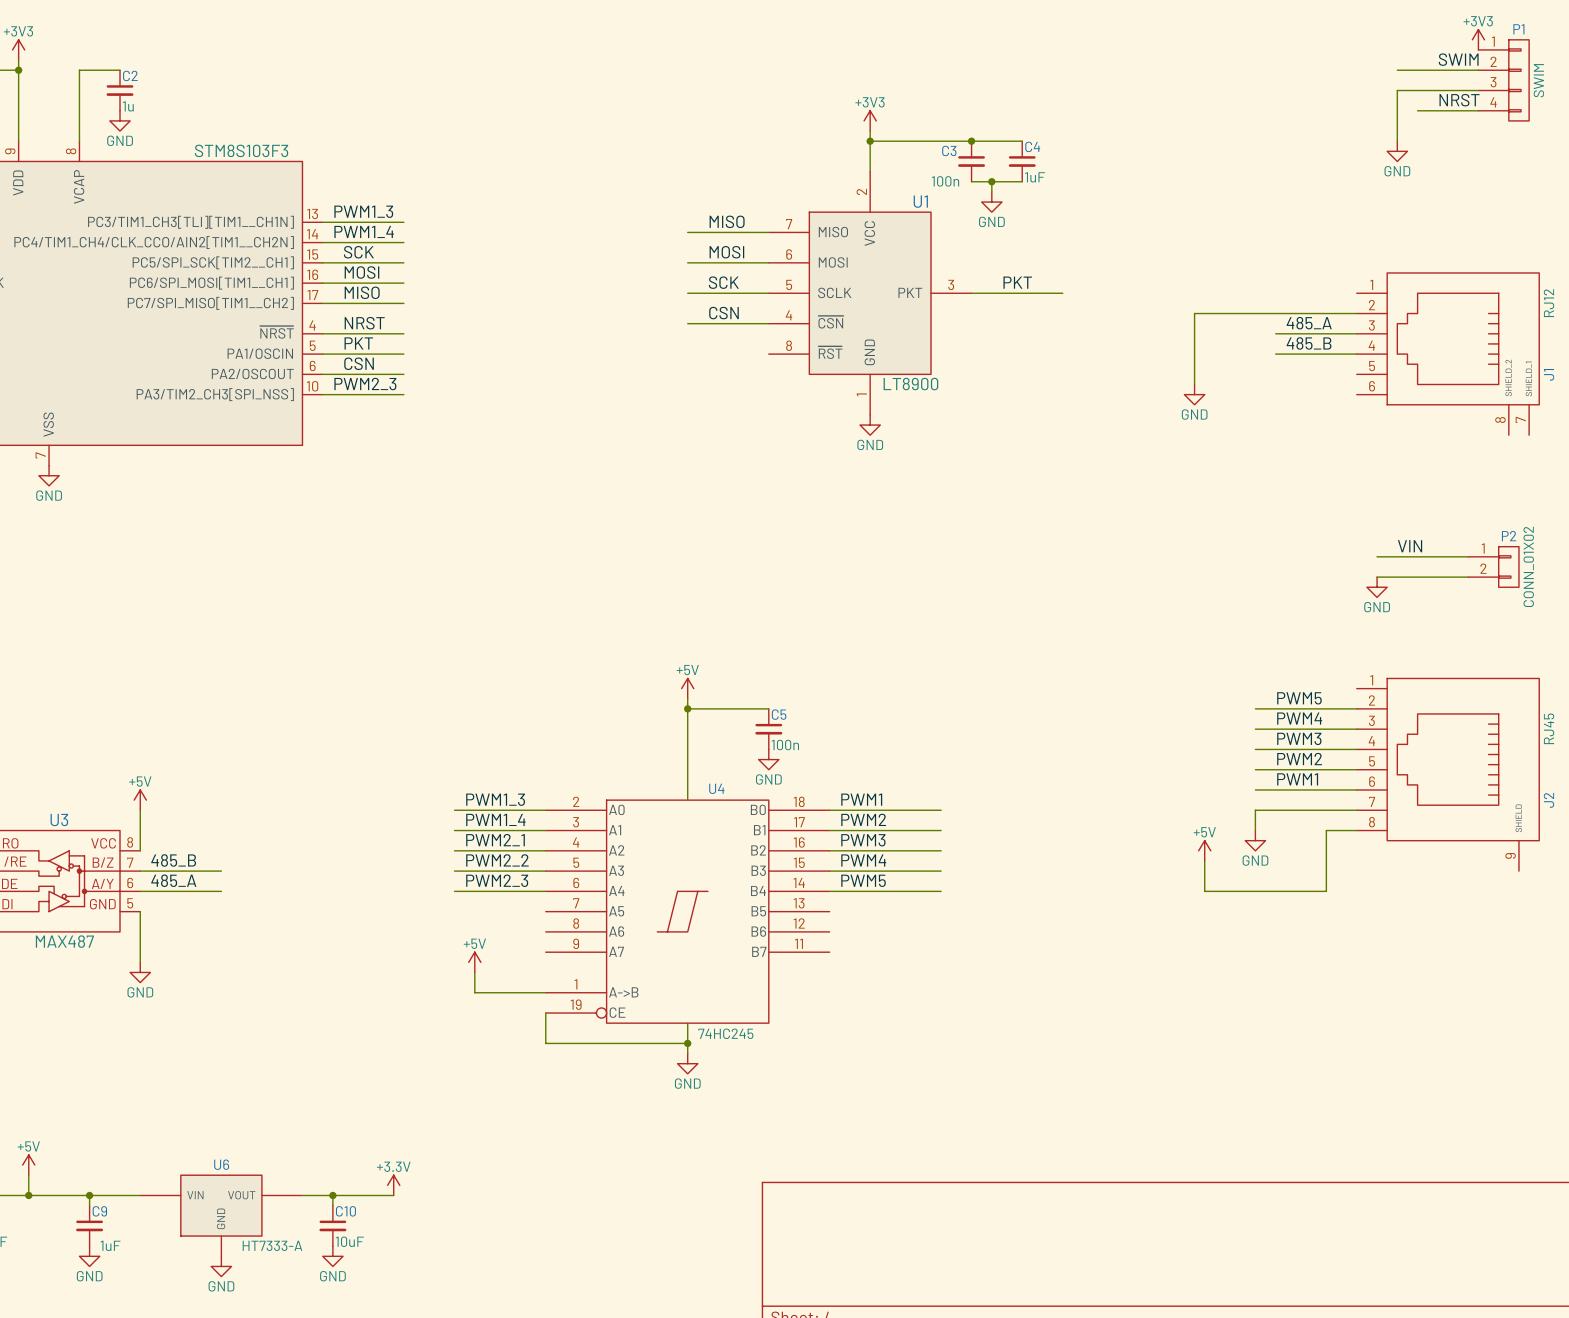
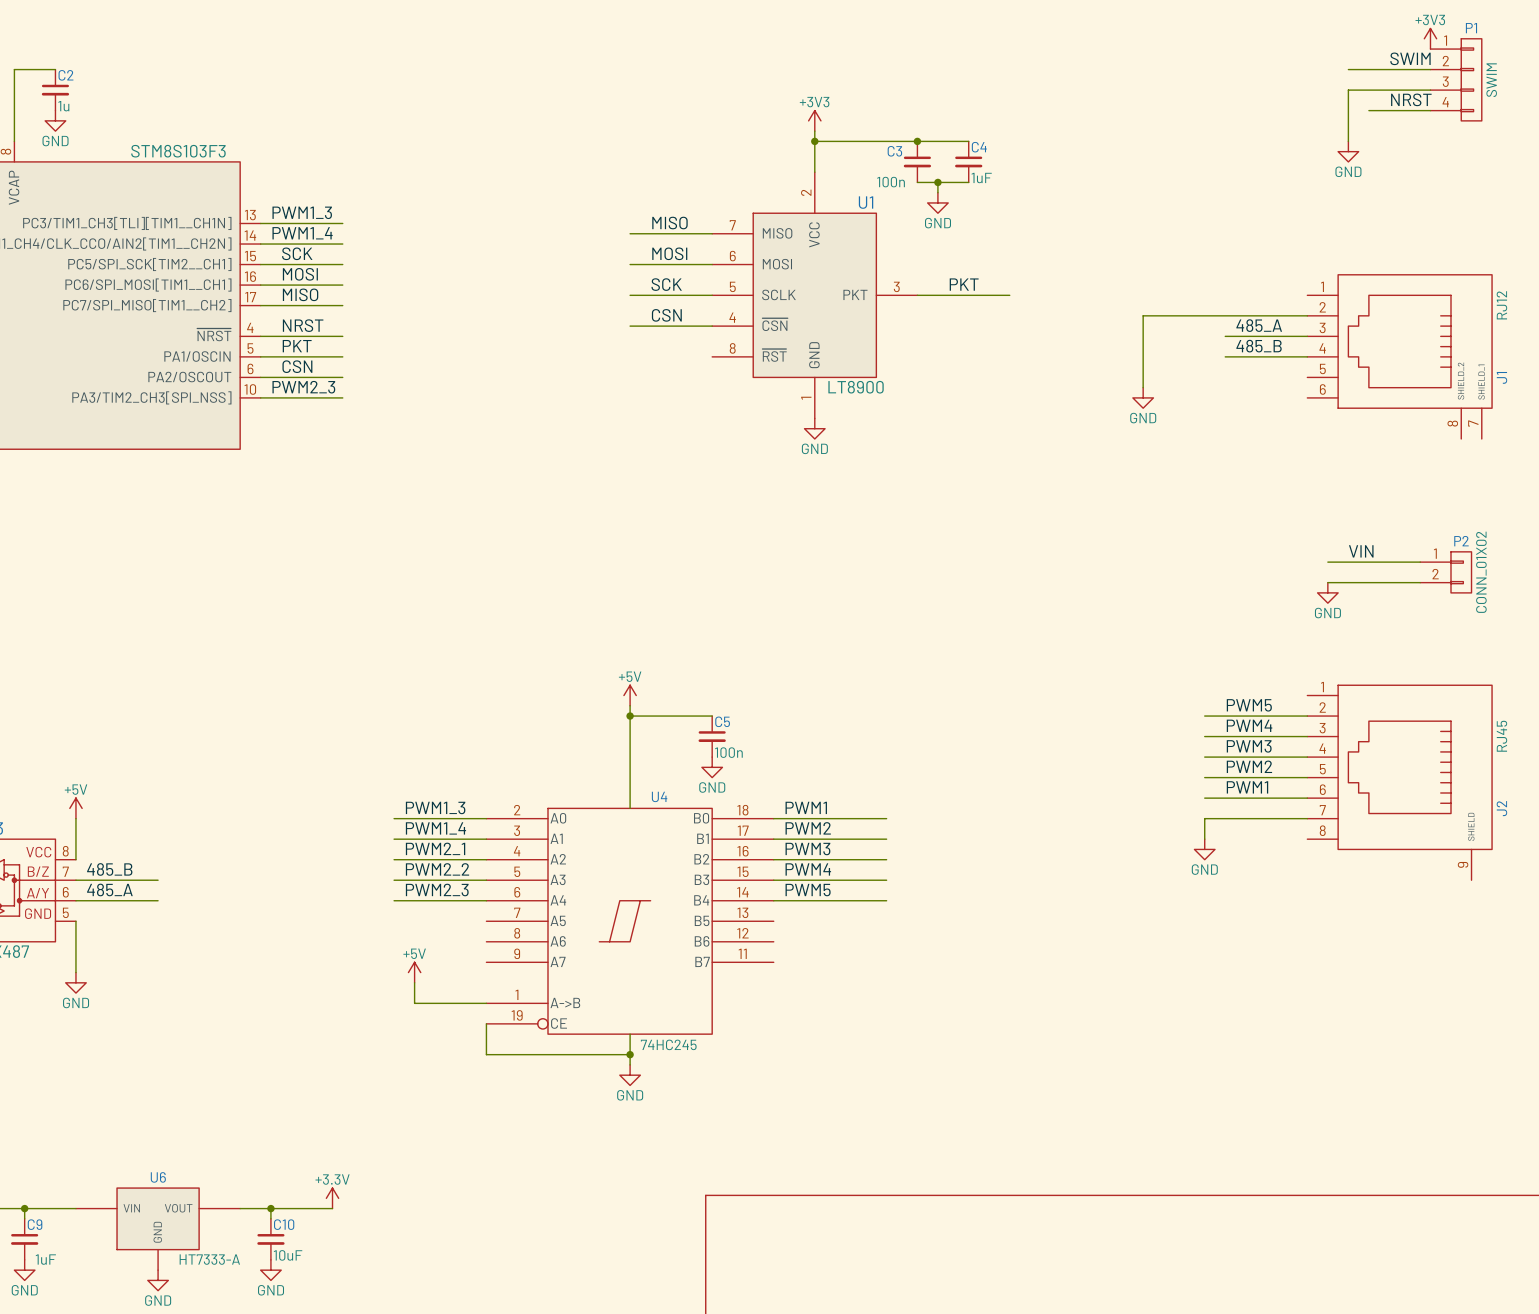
wire: (1356, 830) (1326, 830) (1326, 891) (1204, 891) (1204, 860) -> none
power symbol: +5V (1204, 850) -> none

